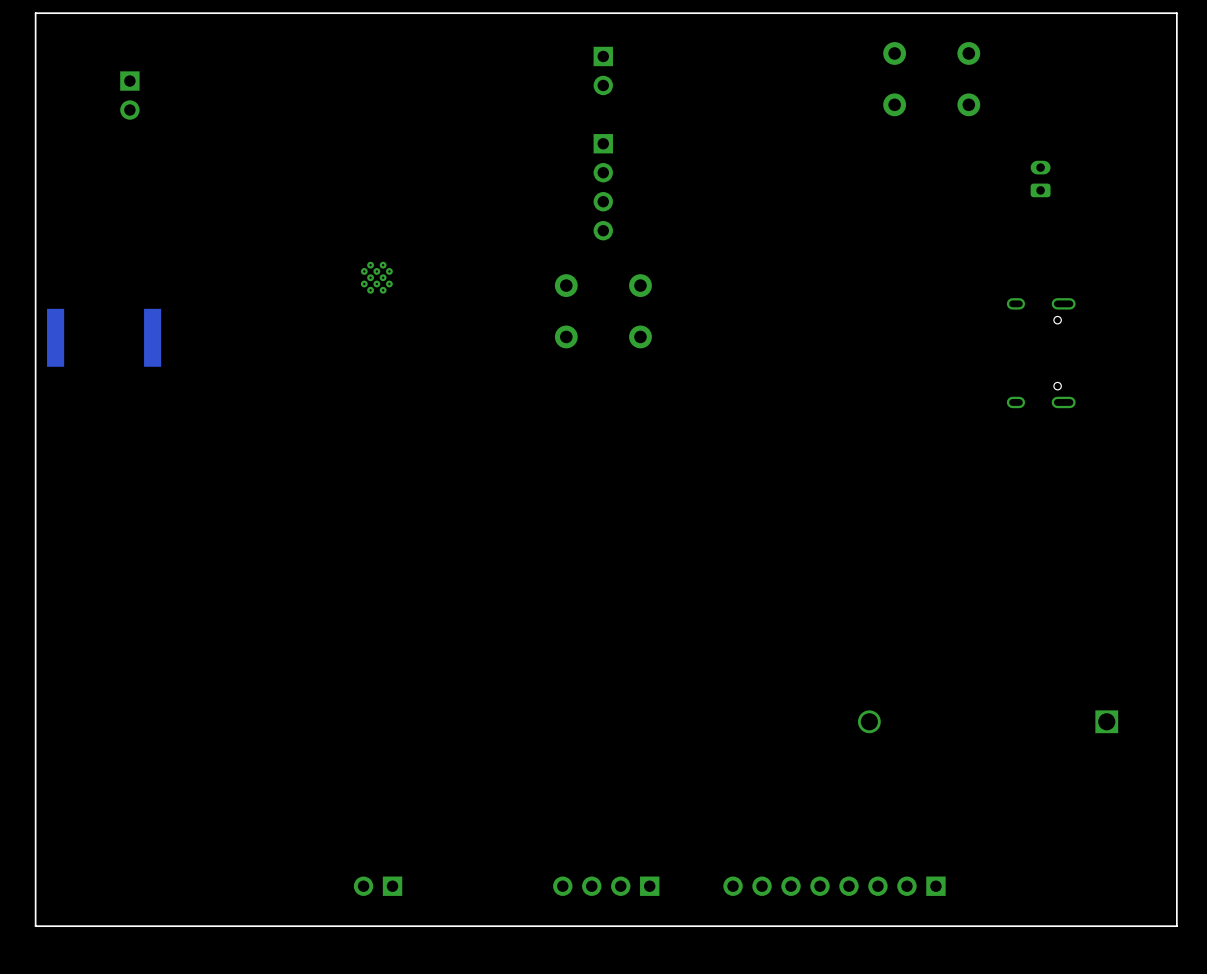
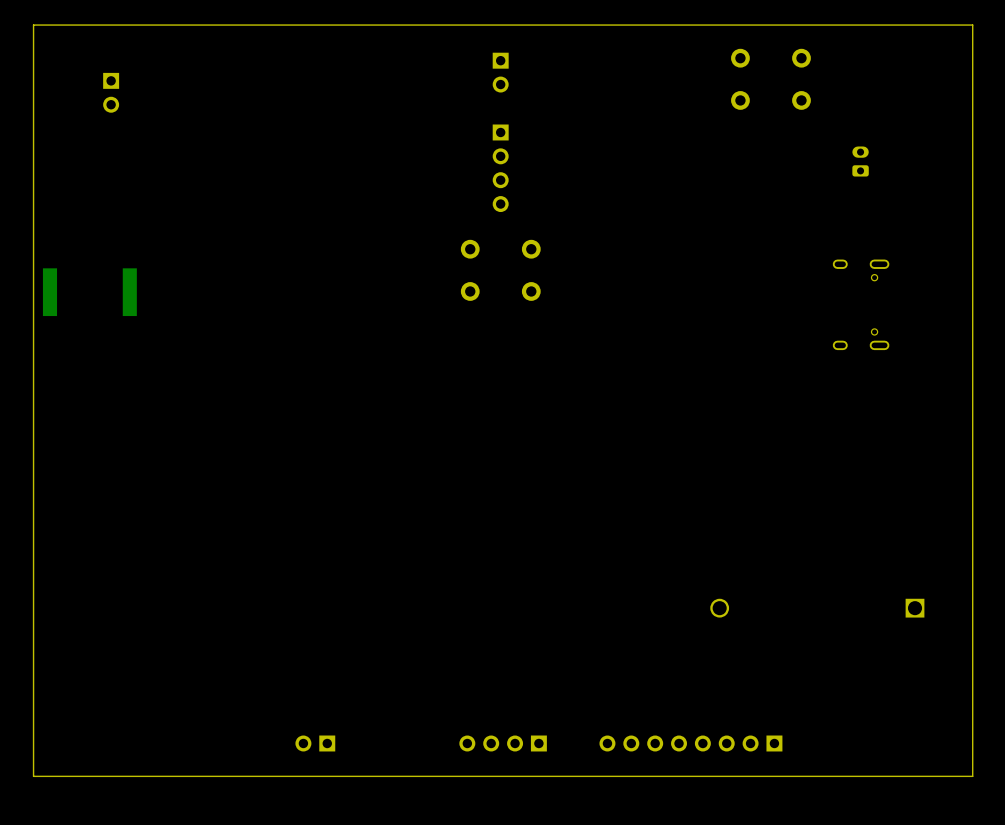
part: (376, 277) -> none

